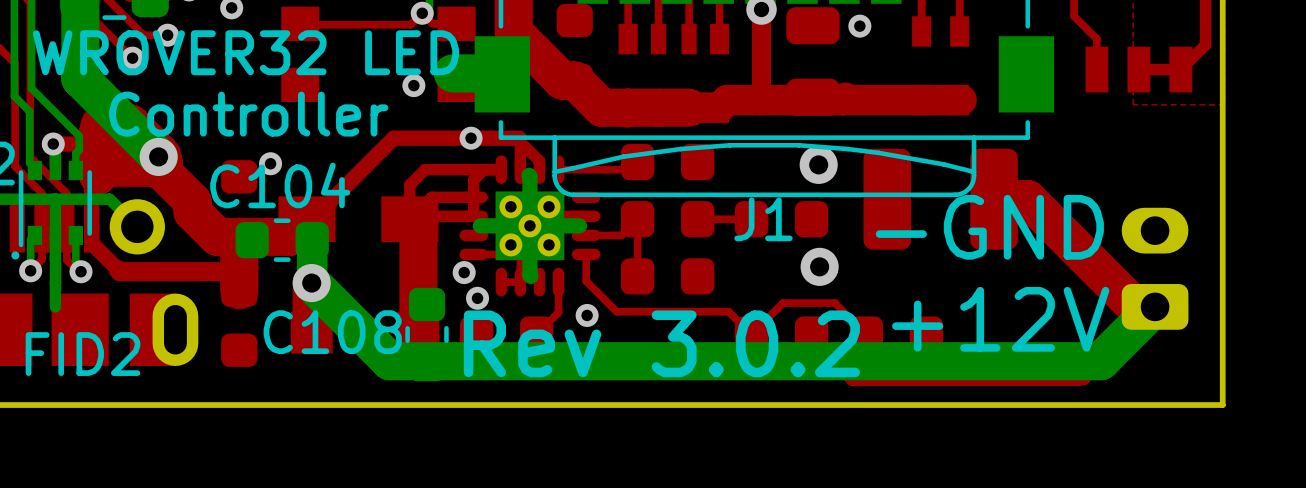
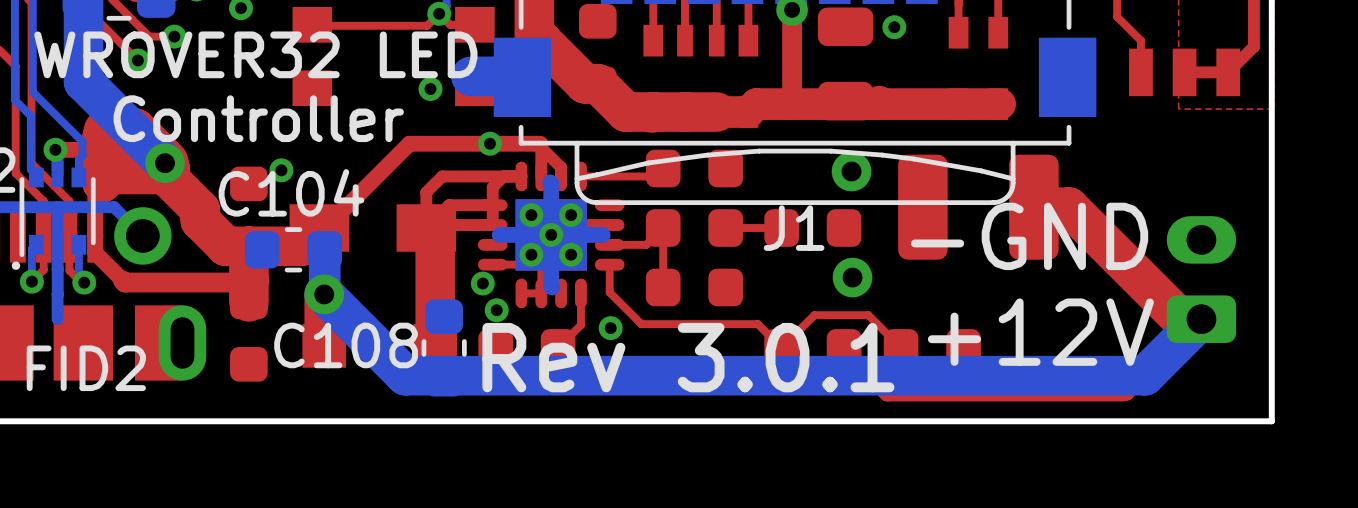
text: Rev 3.0.2 (661, 343) -> Rev 3.0.1 (688, 357)

